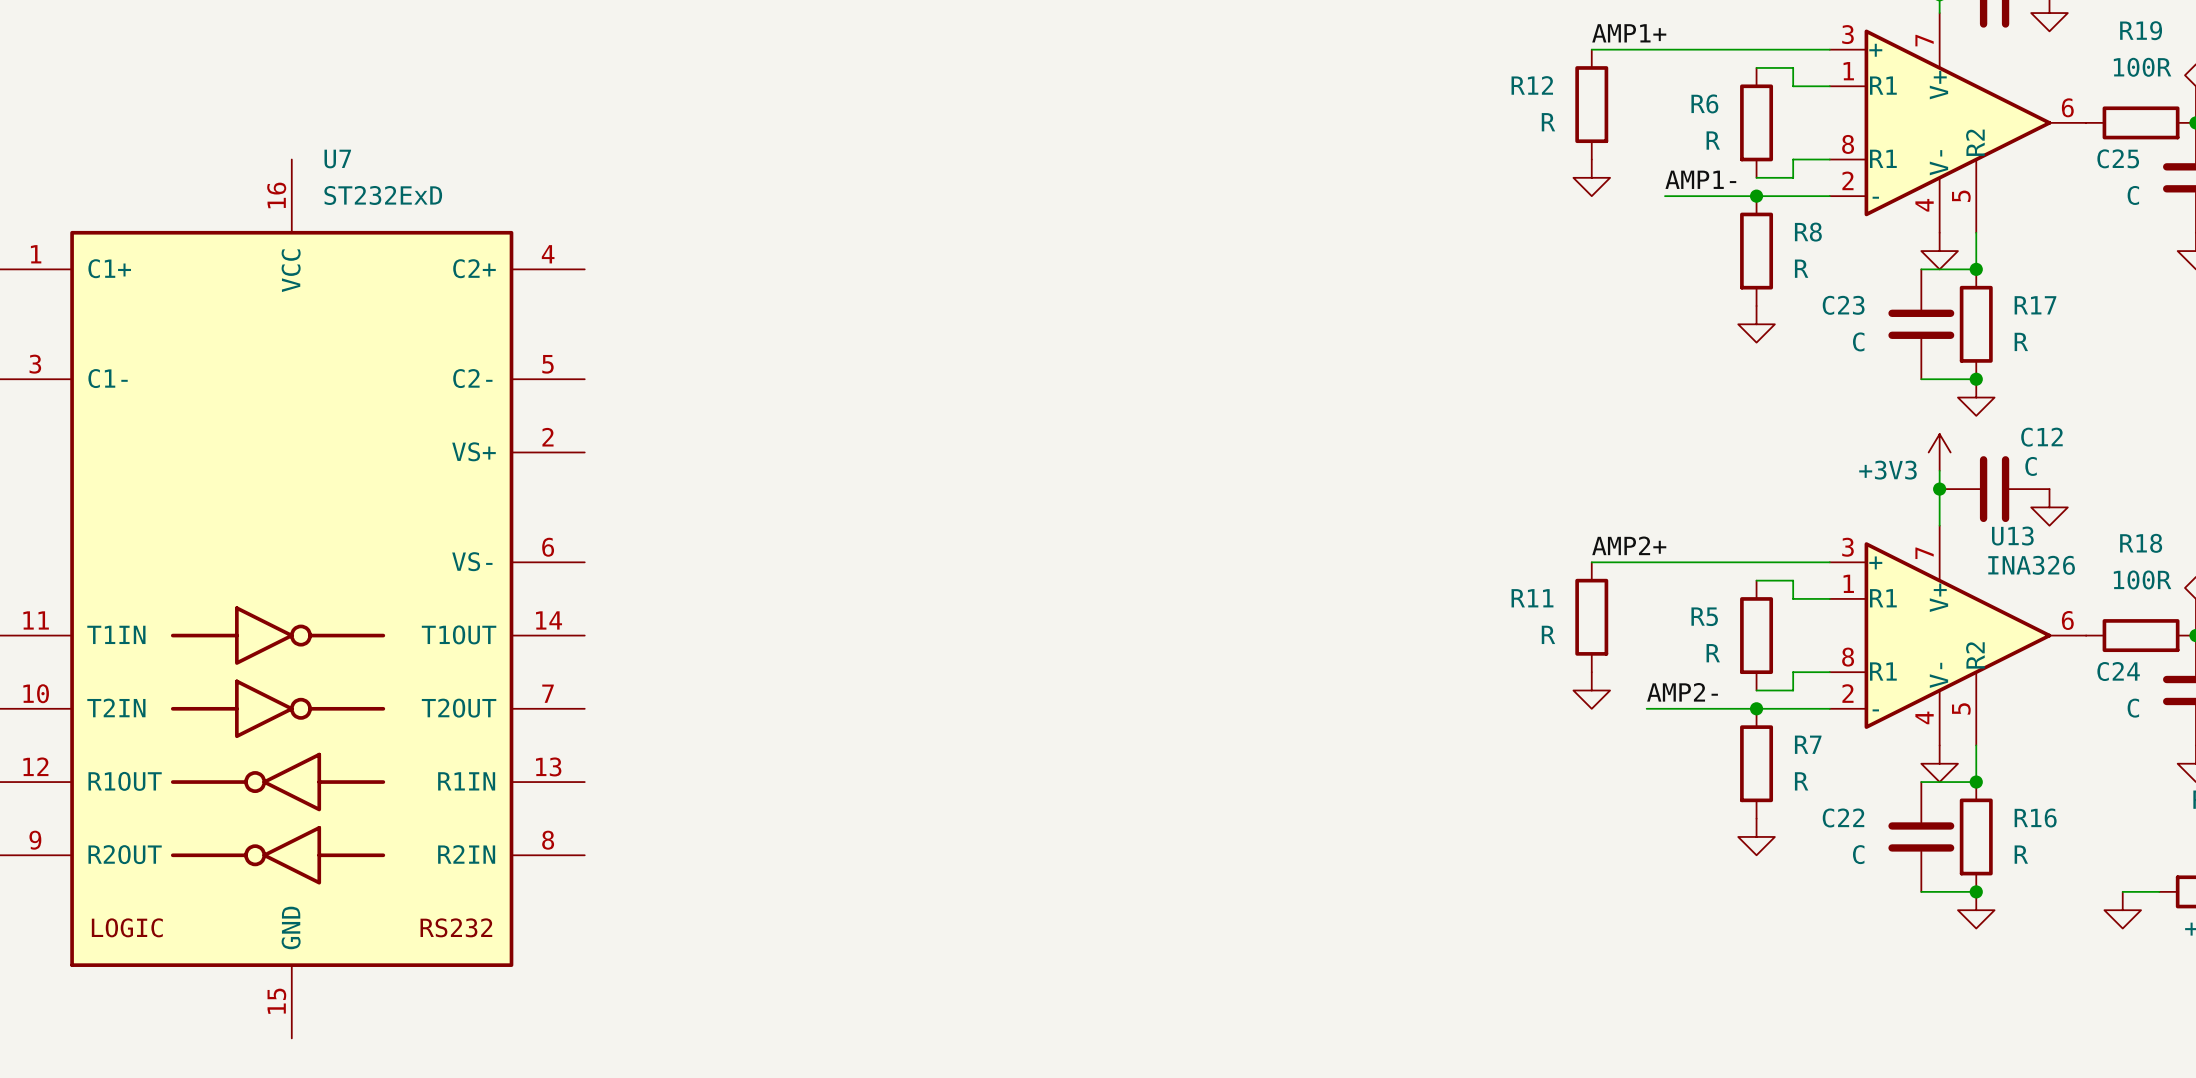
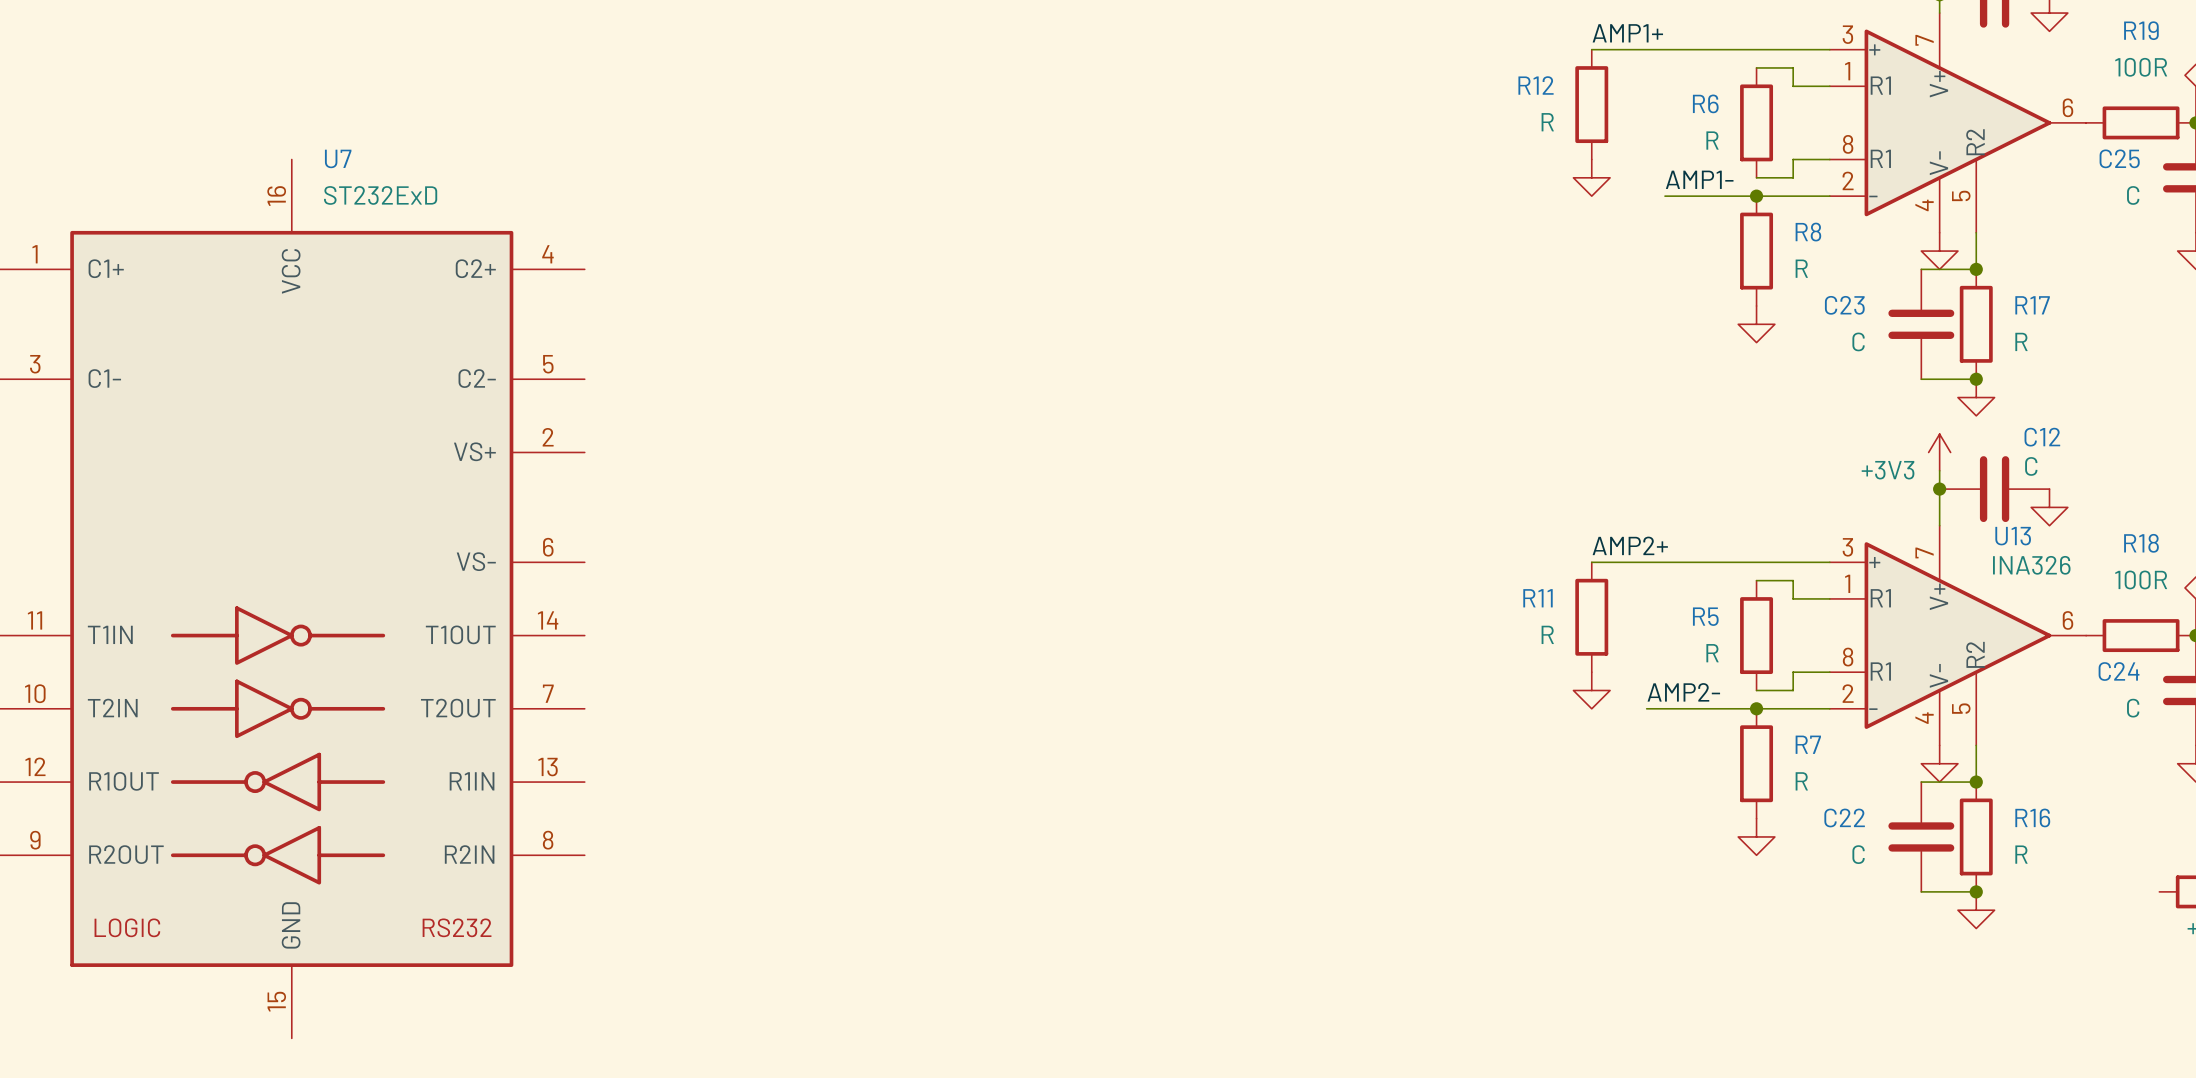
wire: (2122, 891) (2159, 891) -> none
power symbol: (2122, 910) -> none

